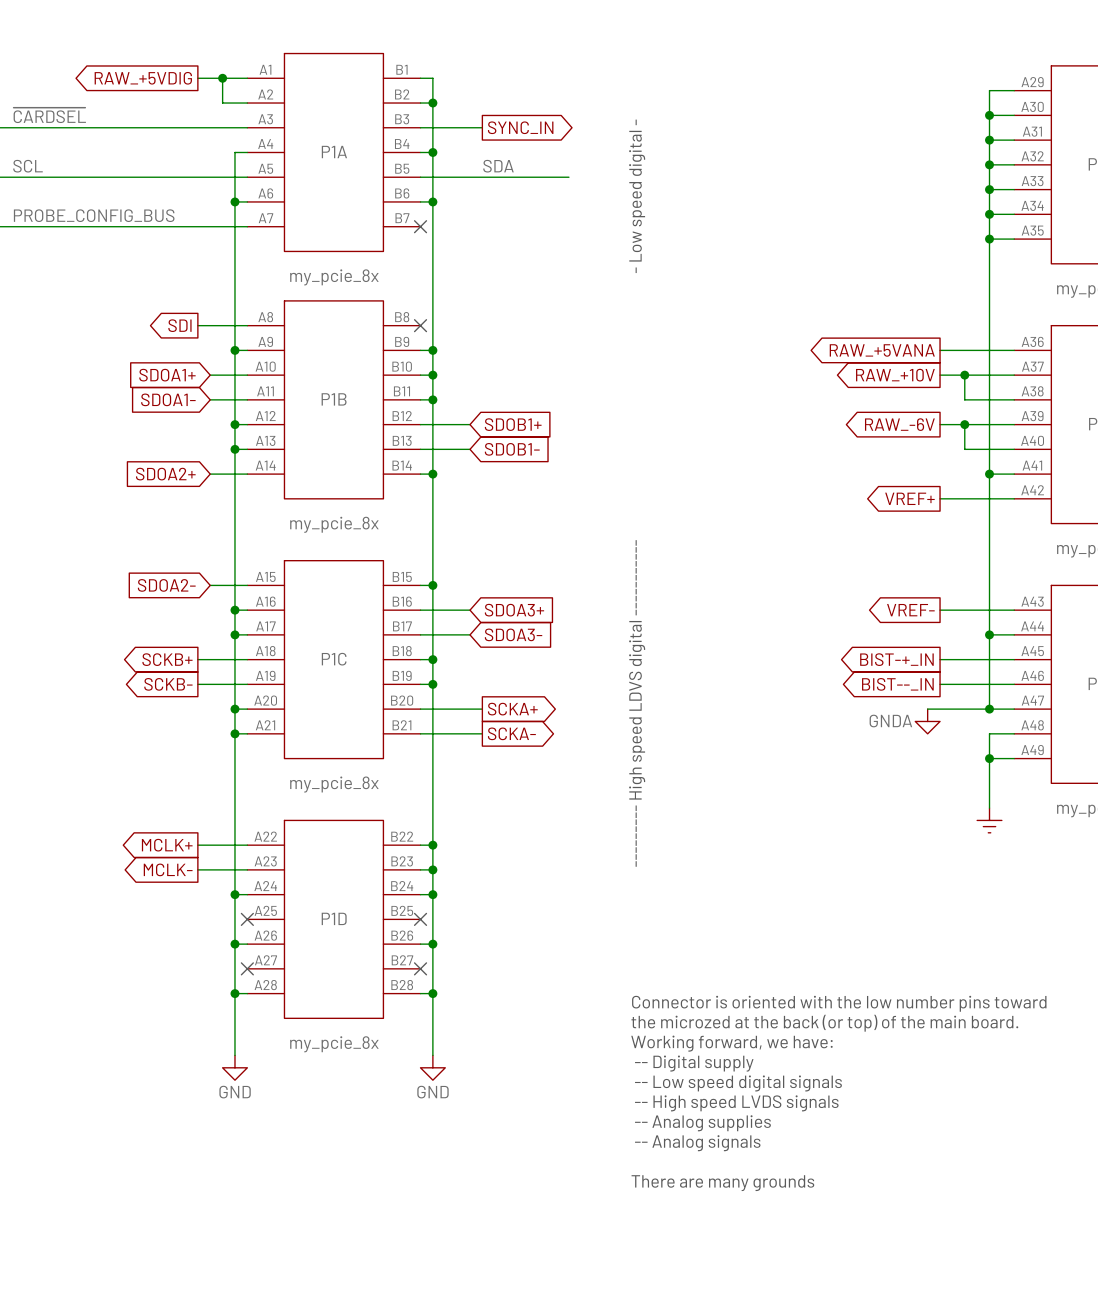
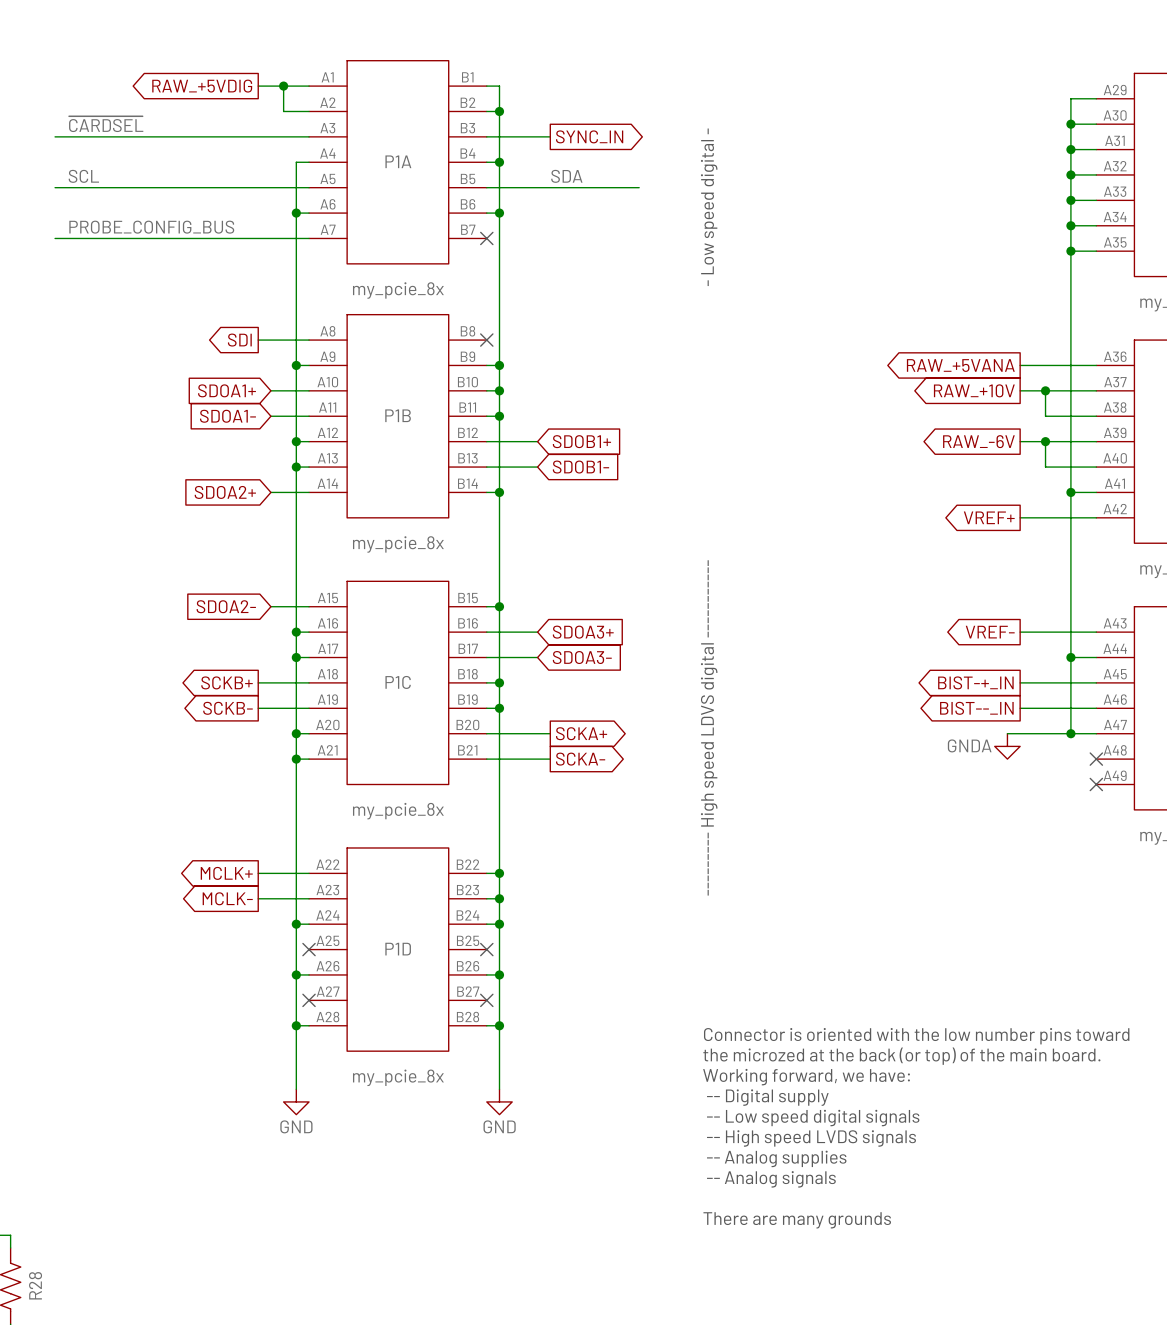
wire: (1014, 733) (989, 733) (989, 808) -> none
no-connect mark: none -> (1096, 759)
wire: (989, 758) (1014, 758) -> none
junction: (989, 758) -> none
no-connect mark: none -> (1096, 784)
power symbol: (989, 820) -> none

